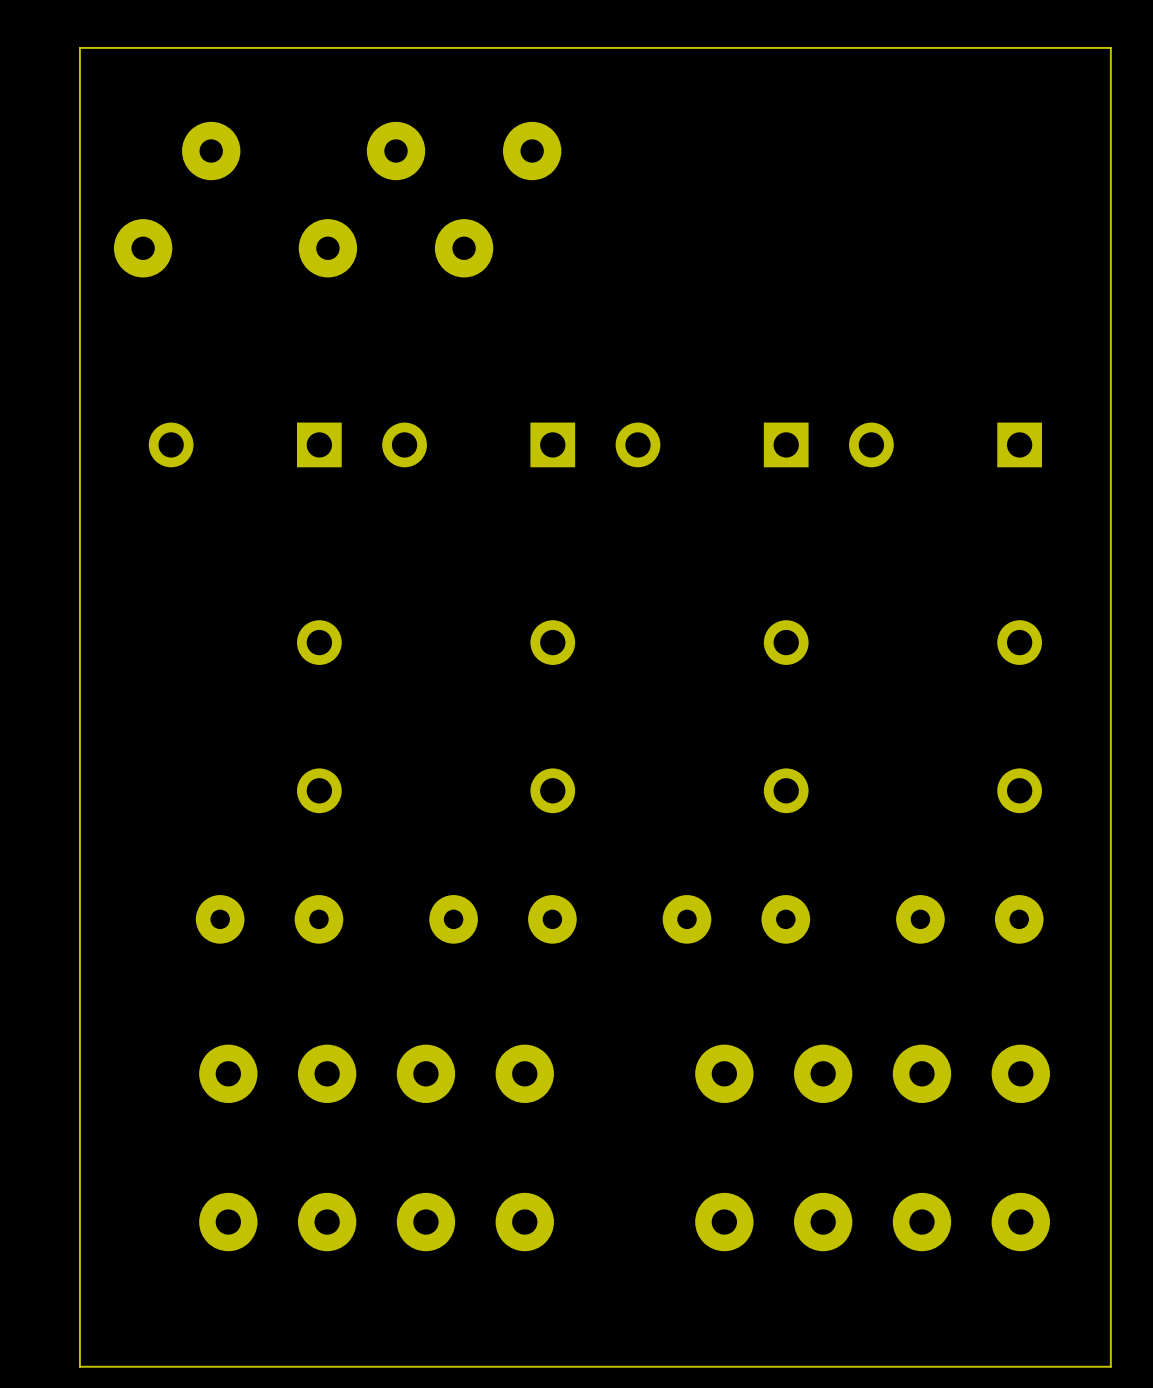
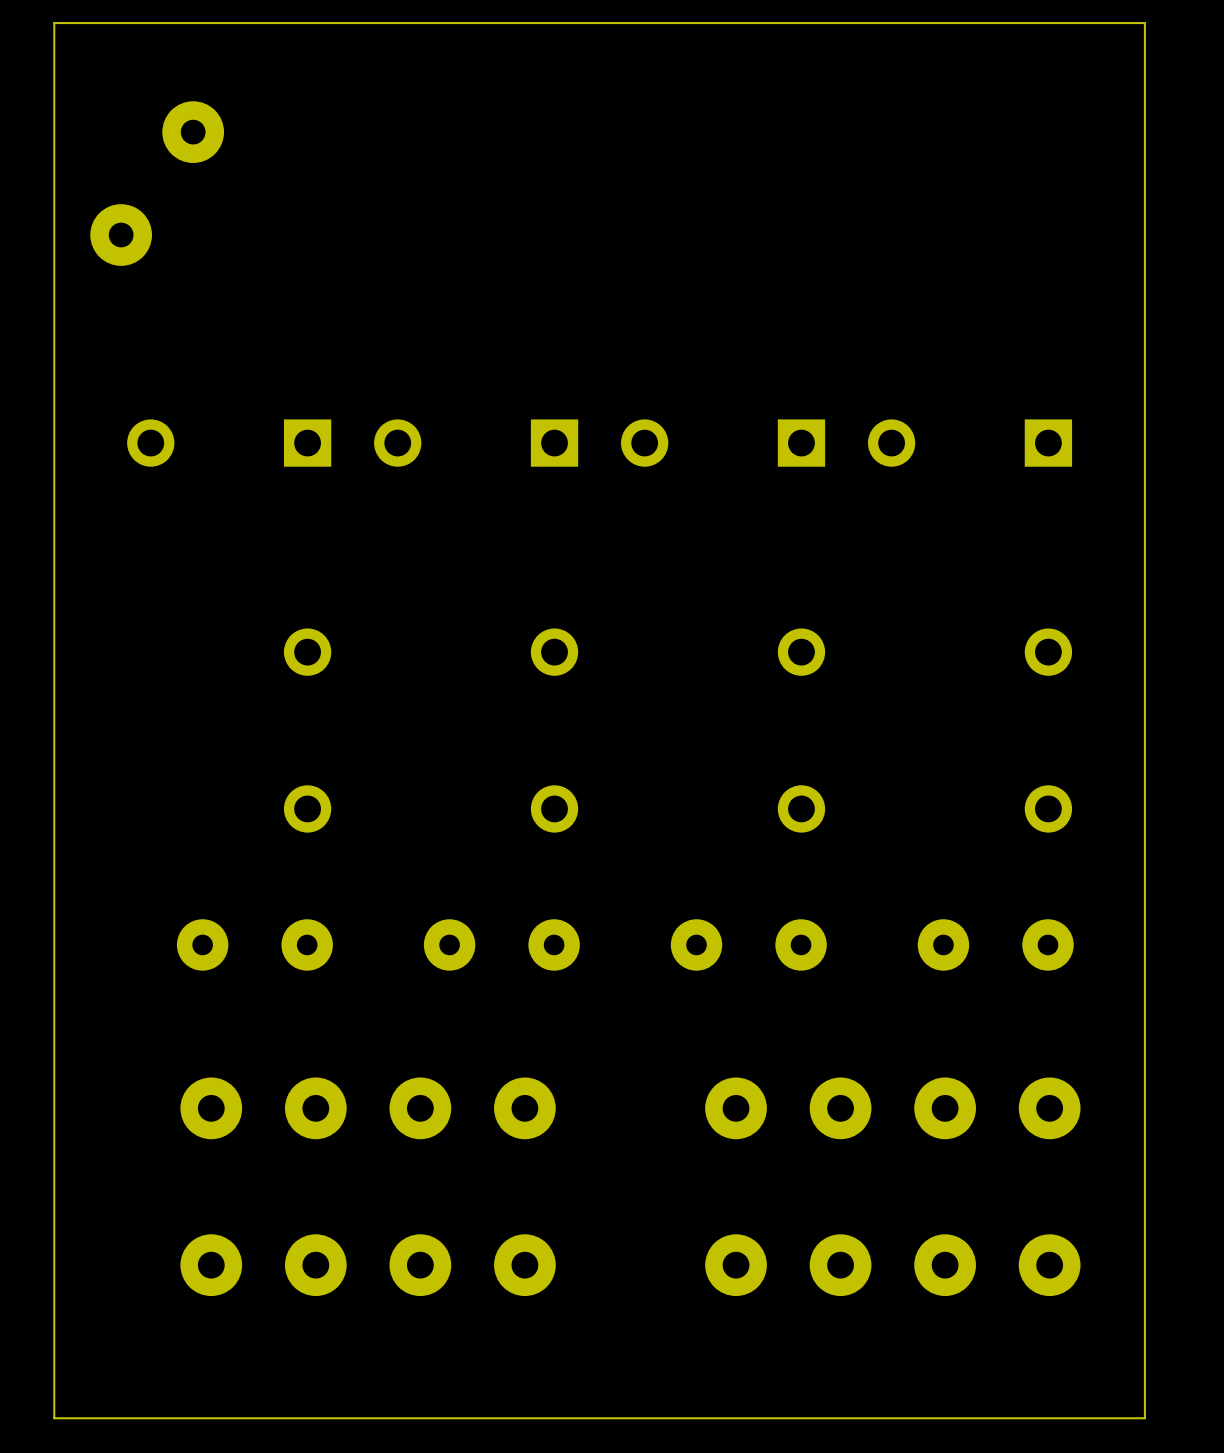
part: (430, 199) -> none

